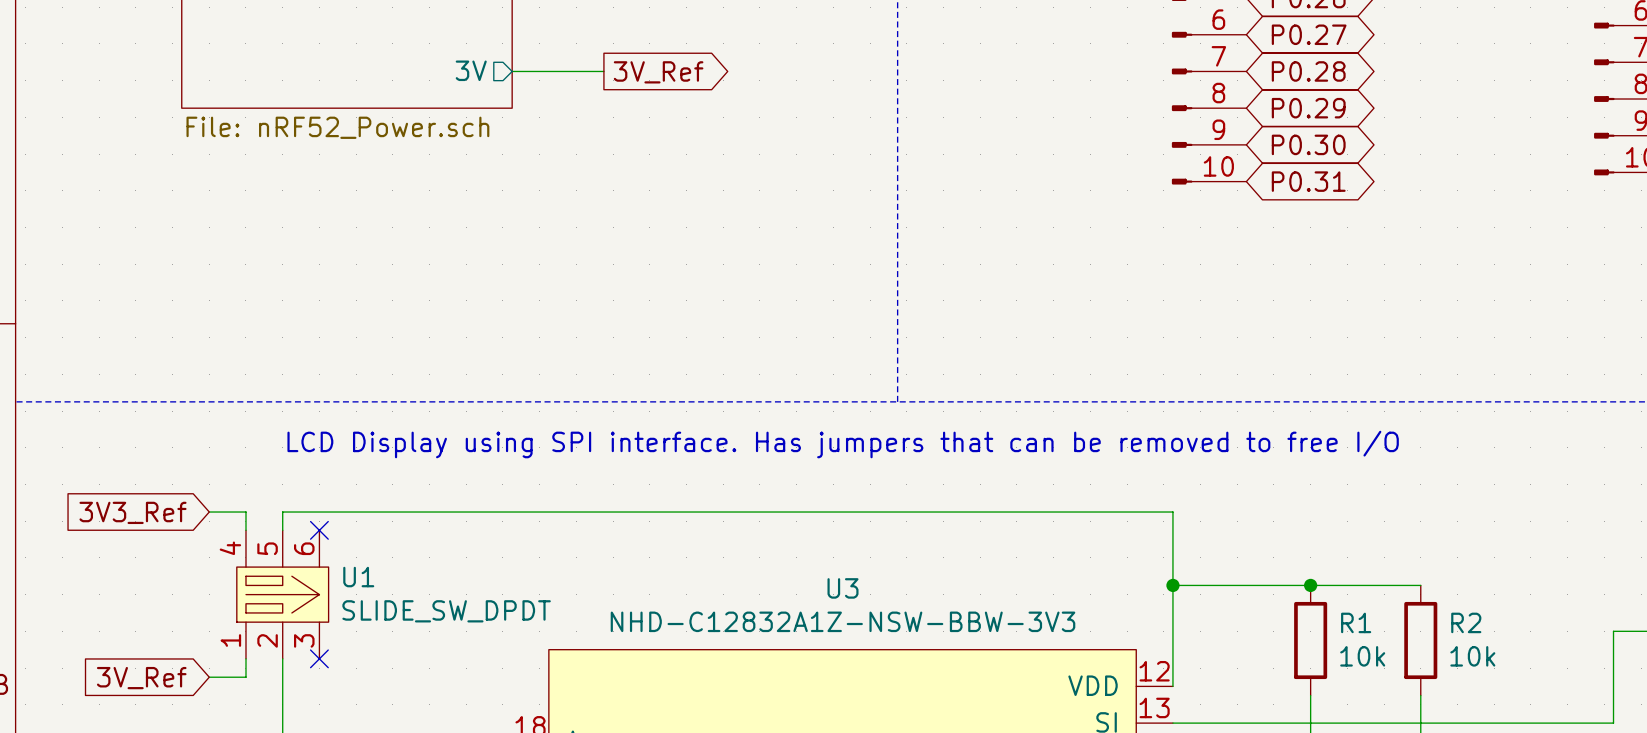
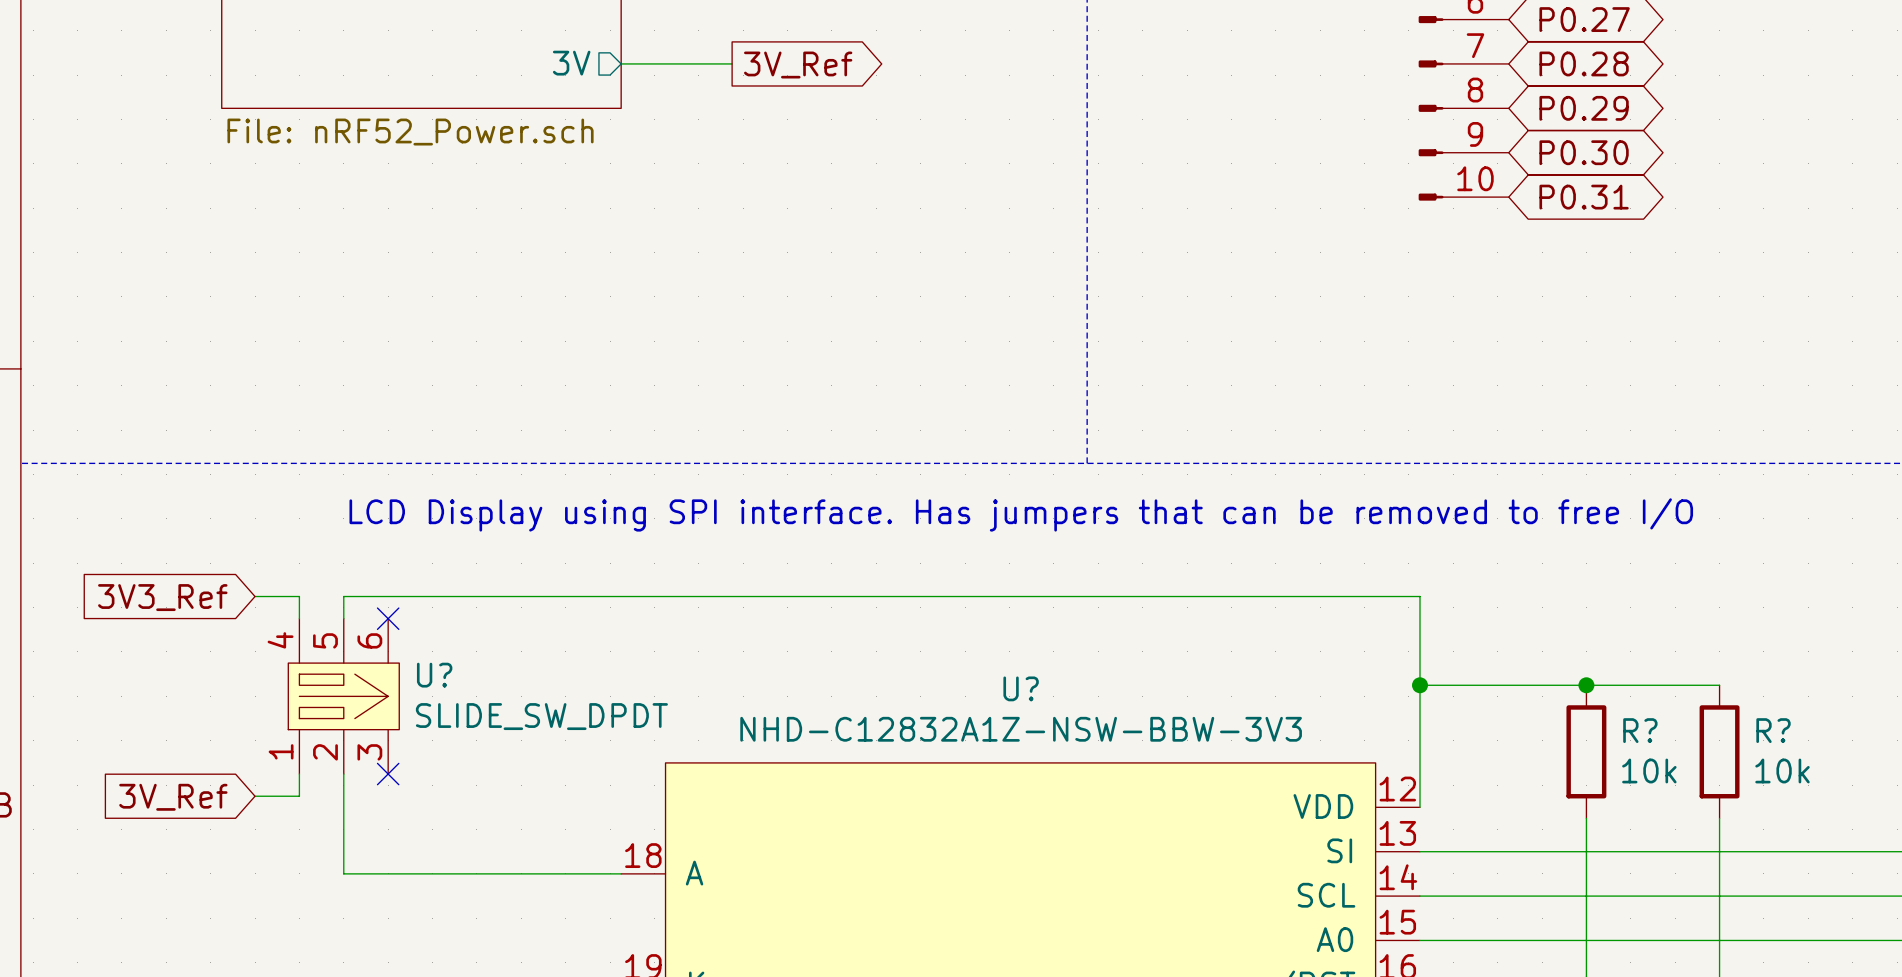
U1 name: U1 (358, 577) -> U? (434, 675)
U3 name: U3 (843, 588) -> U? (1021, 688)
R1 name: R1 (1356, 622) -> R? (1640, 730)
R2 name: R2 (1466, 622) -> R? (1773, 730)

